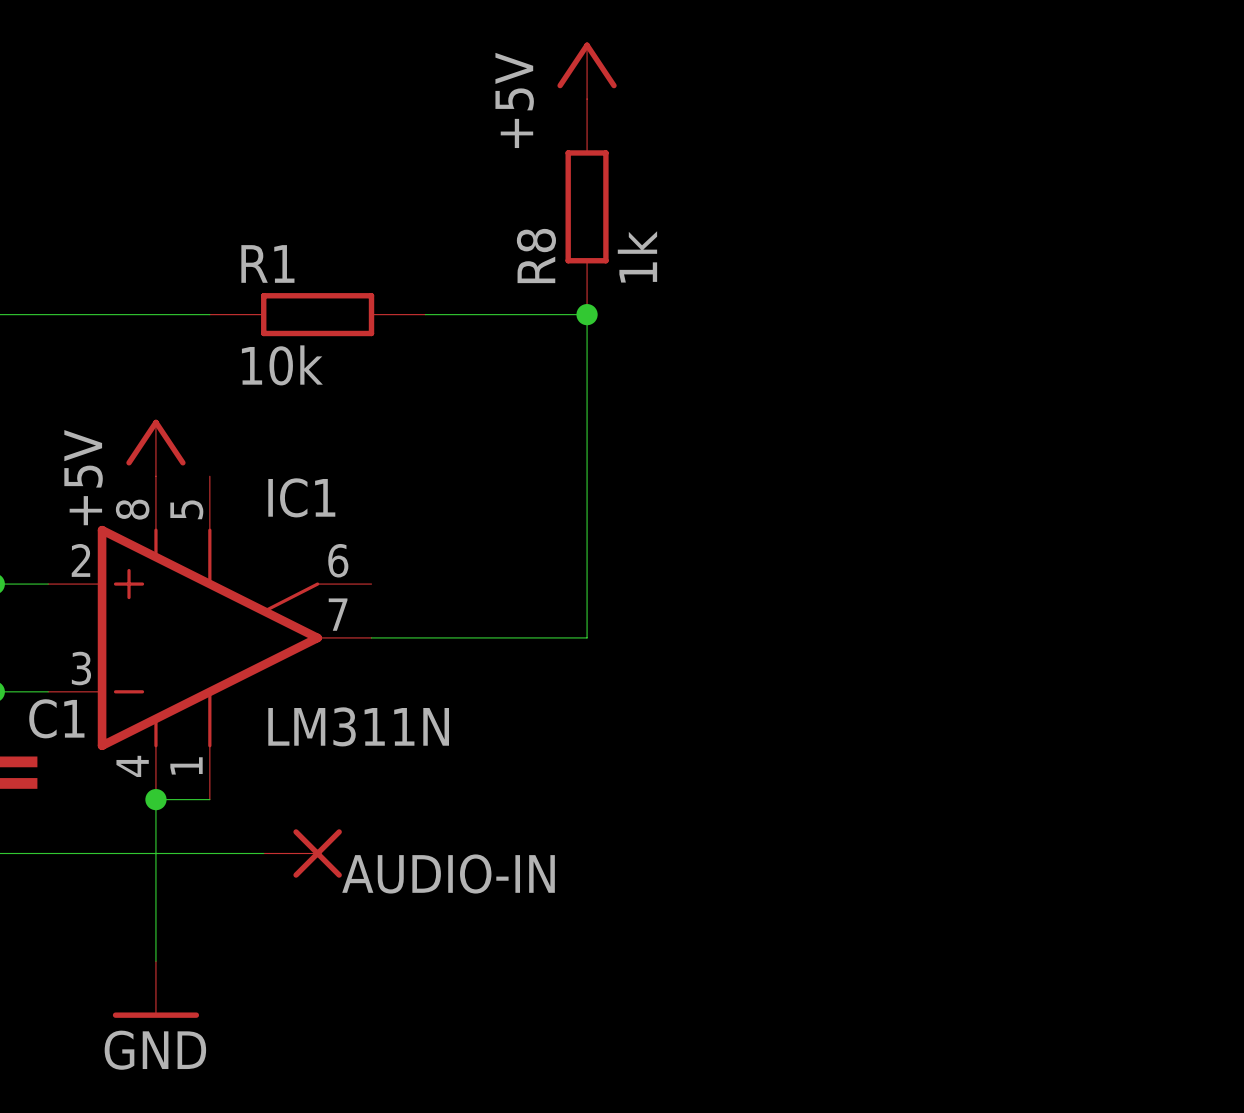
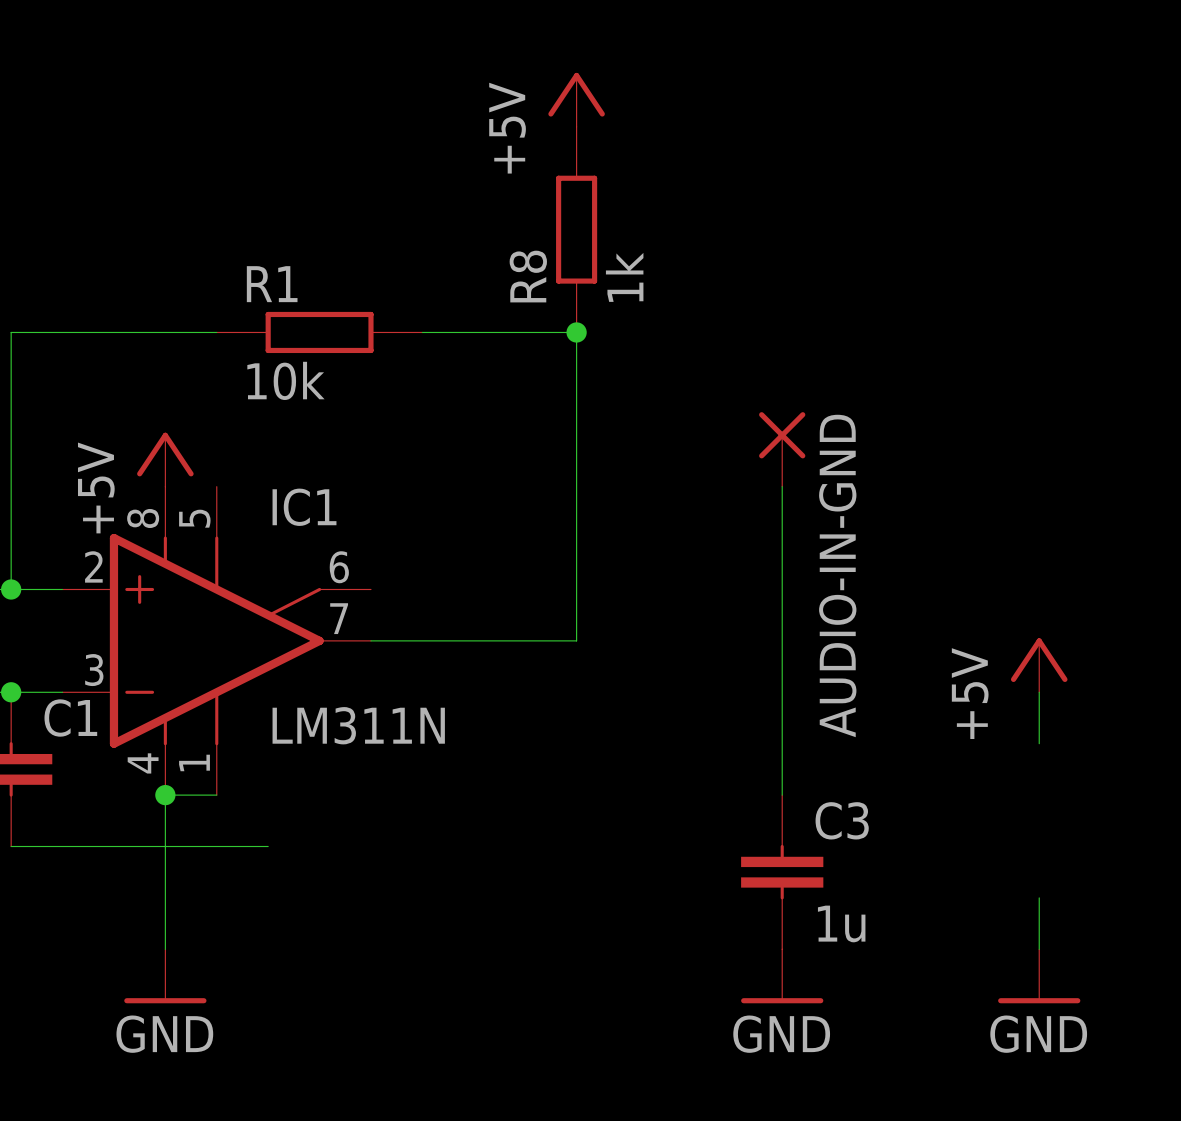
AUDIO-IN-GND: none -> (782, 449)
wire: none -> (782, 486) (782, 795)
power symbol: none -> +5V (1039, 665)
wire: none -> (1039, 692) (1039, 743)
AUDIO-IN: (302, 853) -> none
C3: none -> 1u (782, 872)
wire: none -> (1039, 897) (1039, 949)
power symbol: none -> GND (782, 976)
power symbol: none -> GND (1039, 976)

